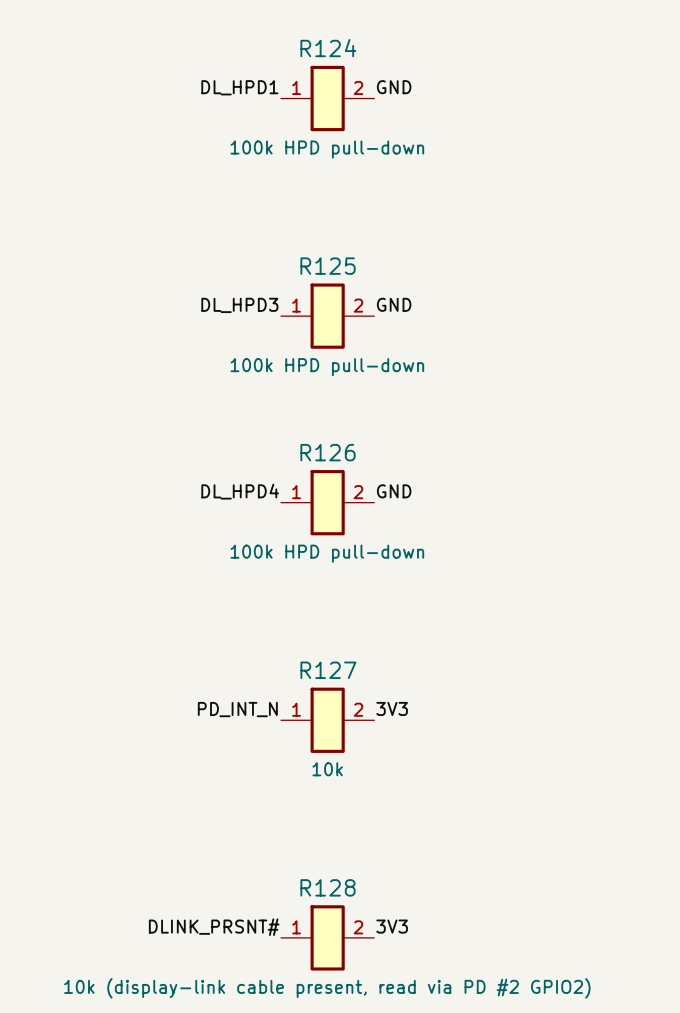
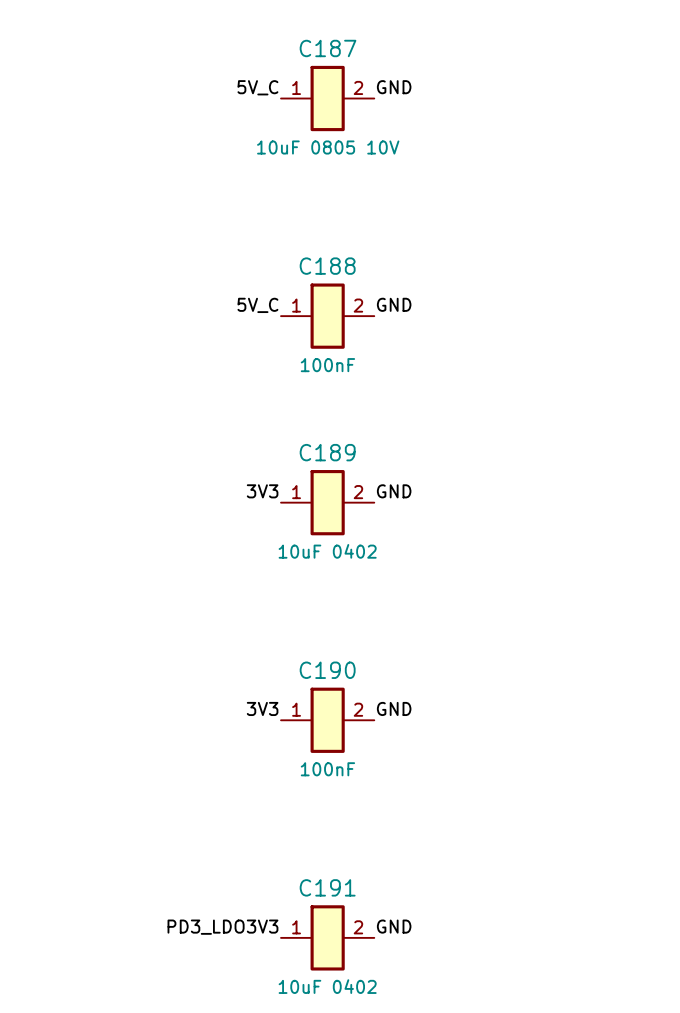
R124 name: R124 (328, 48) -> C187 (328, 48)
label: DL_HPD1 (239, 87) -> 5V_C (257, 87)
R124 value: 100k HPD pull-down (327, 149) -> 10uF 0805 10V (328, 147)
R125 name: R125 (328, 266) -> C188 (327, 266)
label: DL_HPD3 (239, 305) -> 5V_C (257, 305)
R125 value: 100k HPD pull-down (327, 367) -> 100nF (327, 365)
R126 name: R126 (328, 452) -> C189 (327, 452)
label: DL_HPD4 (240, 491) -> 3V3 (262, 491)
R126 value: 100k HPD pull-down (327, 553) -> 10uF 0402 (327, 551)
R127 name: R127 (328, 670) -> C190 (327, 670)
label: 3V3 (392, 708) -> GND (394, 708)
label: PD_INT_N (237, 709) -> 3V3 (262, 708)
R127 value: 10k (327, 769) -> 100nF (327, 769)
R128 name: R128 (328, 887) -> C191 (327, 887)
label: 3V3 (392, 926) -> GND (394, 926)
label: DLINK_PRSNT# (214, 927) -> PD3_LDO3V3 (222, 927)
R128 value: 10k (display-link cable present, read via PD #2 GPIO2) (327, 988) -> 10uF 0402 (327, 986)

